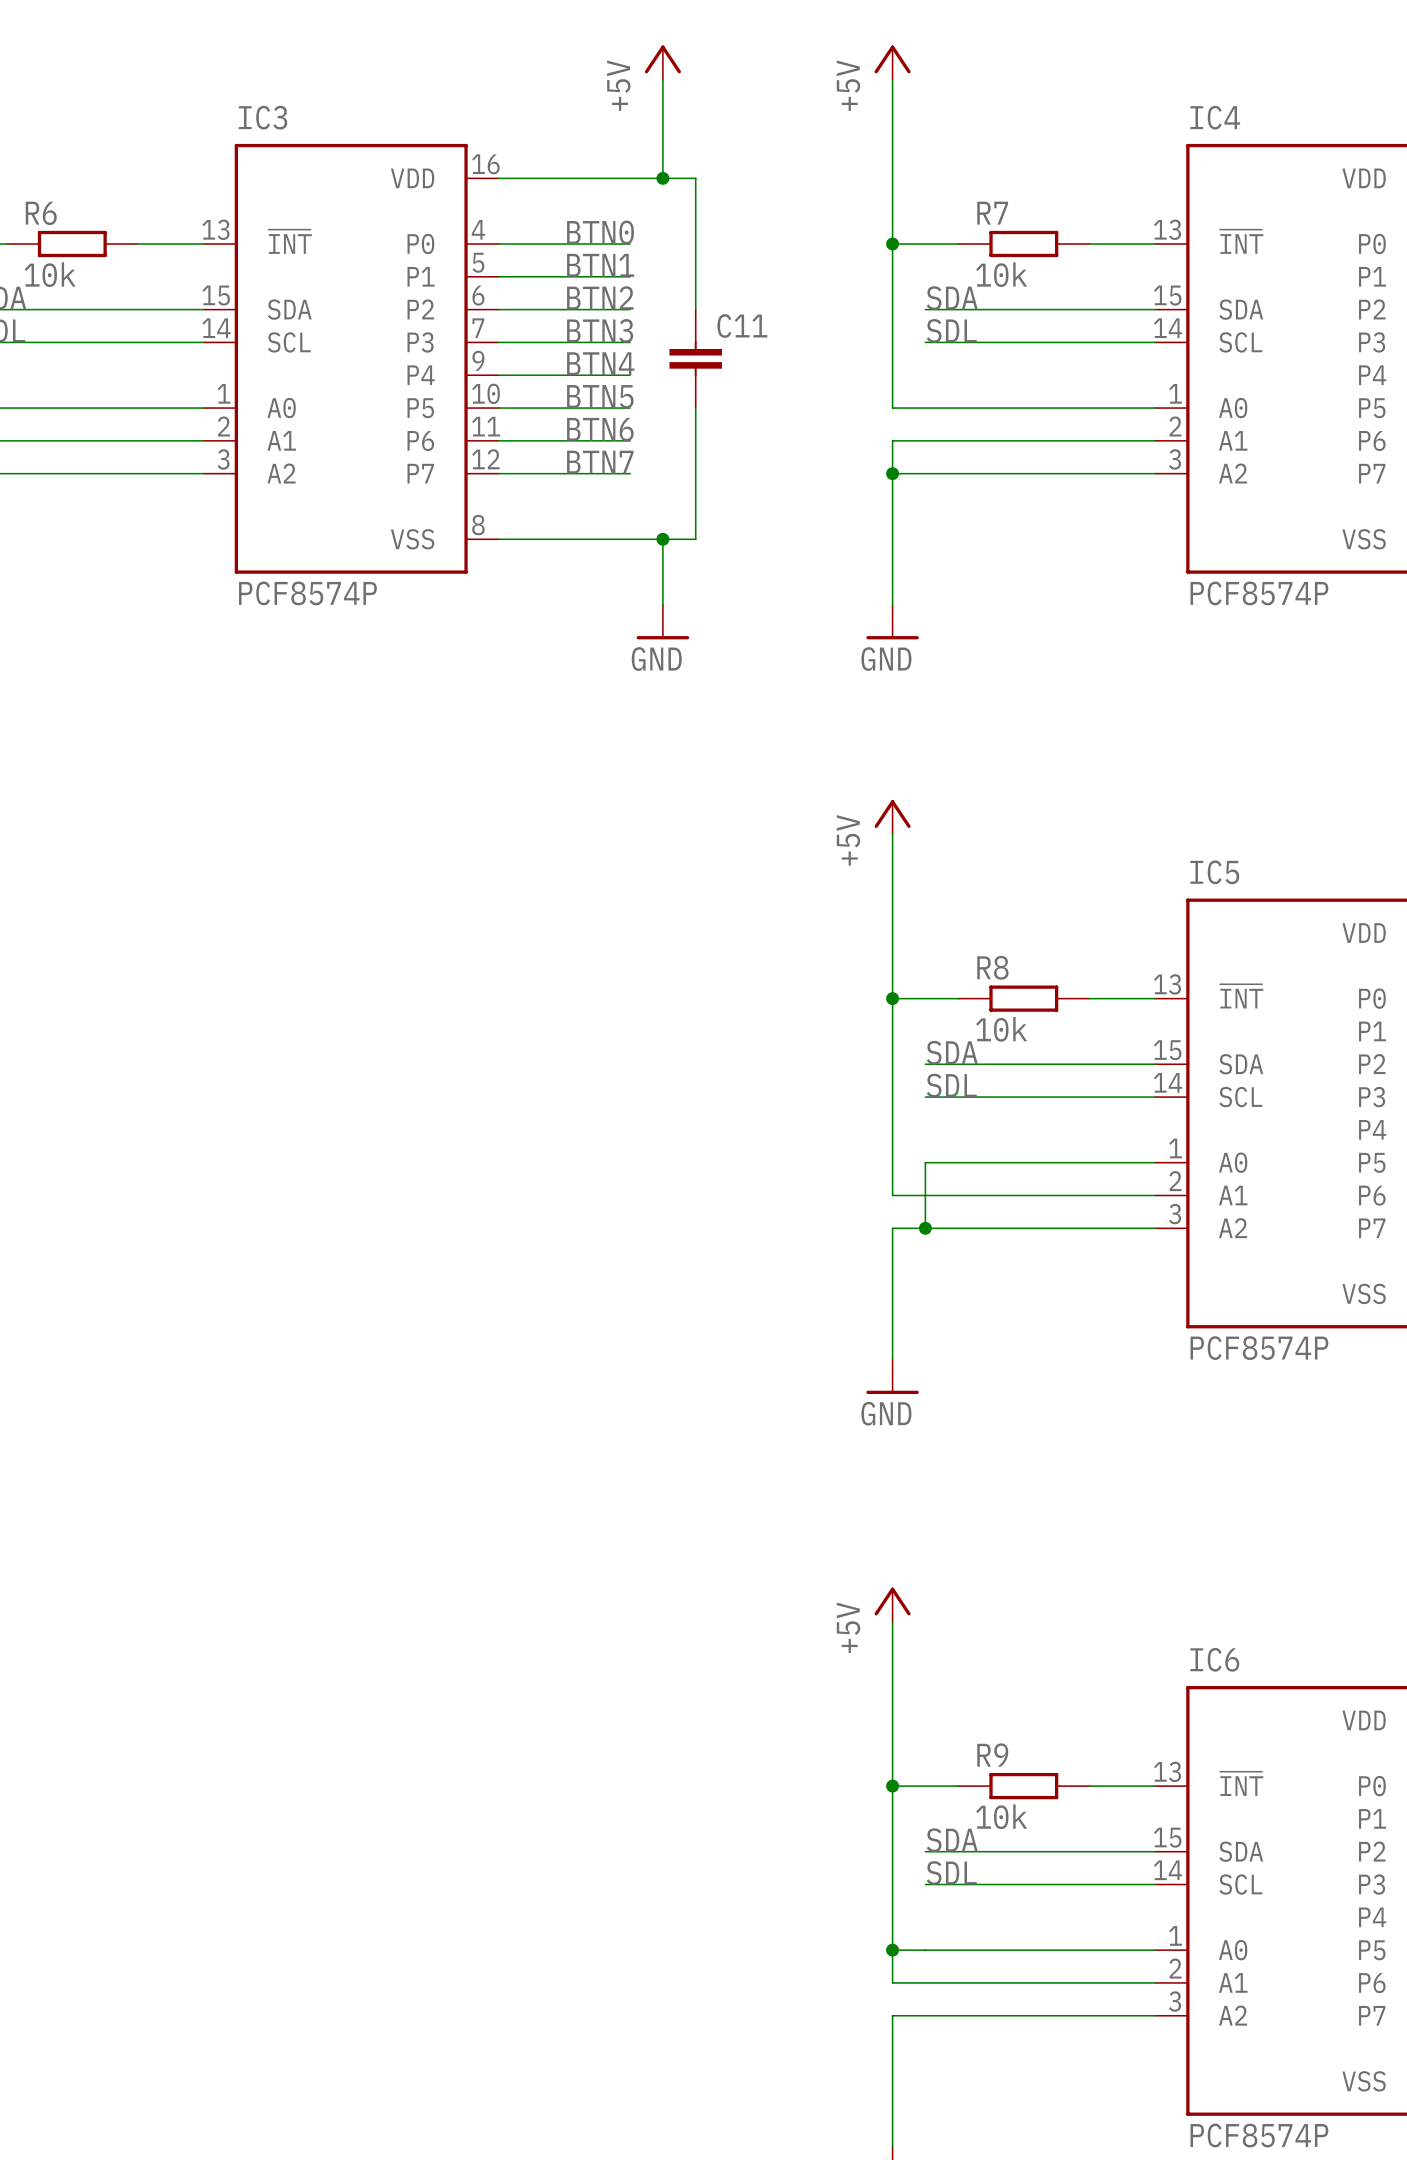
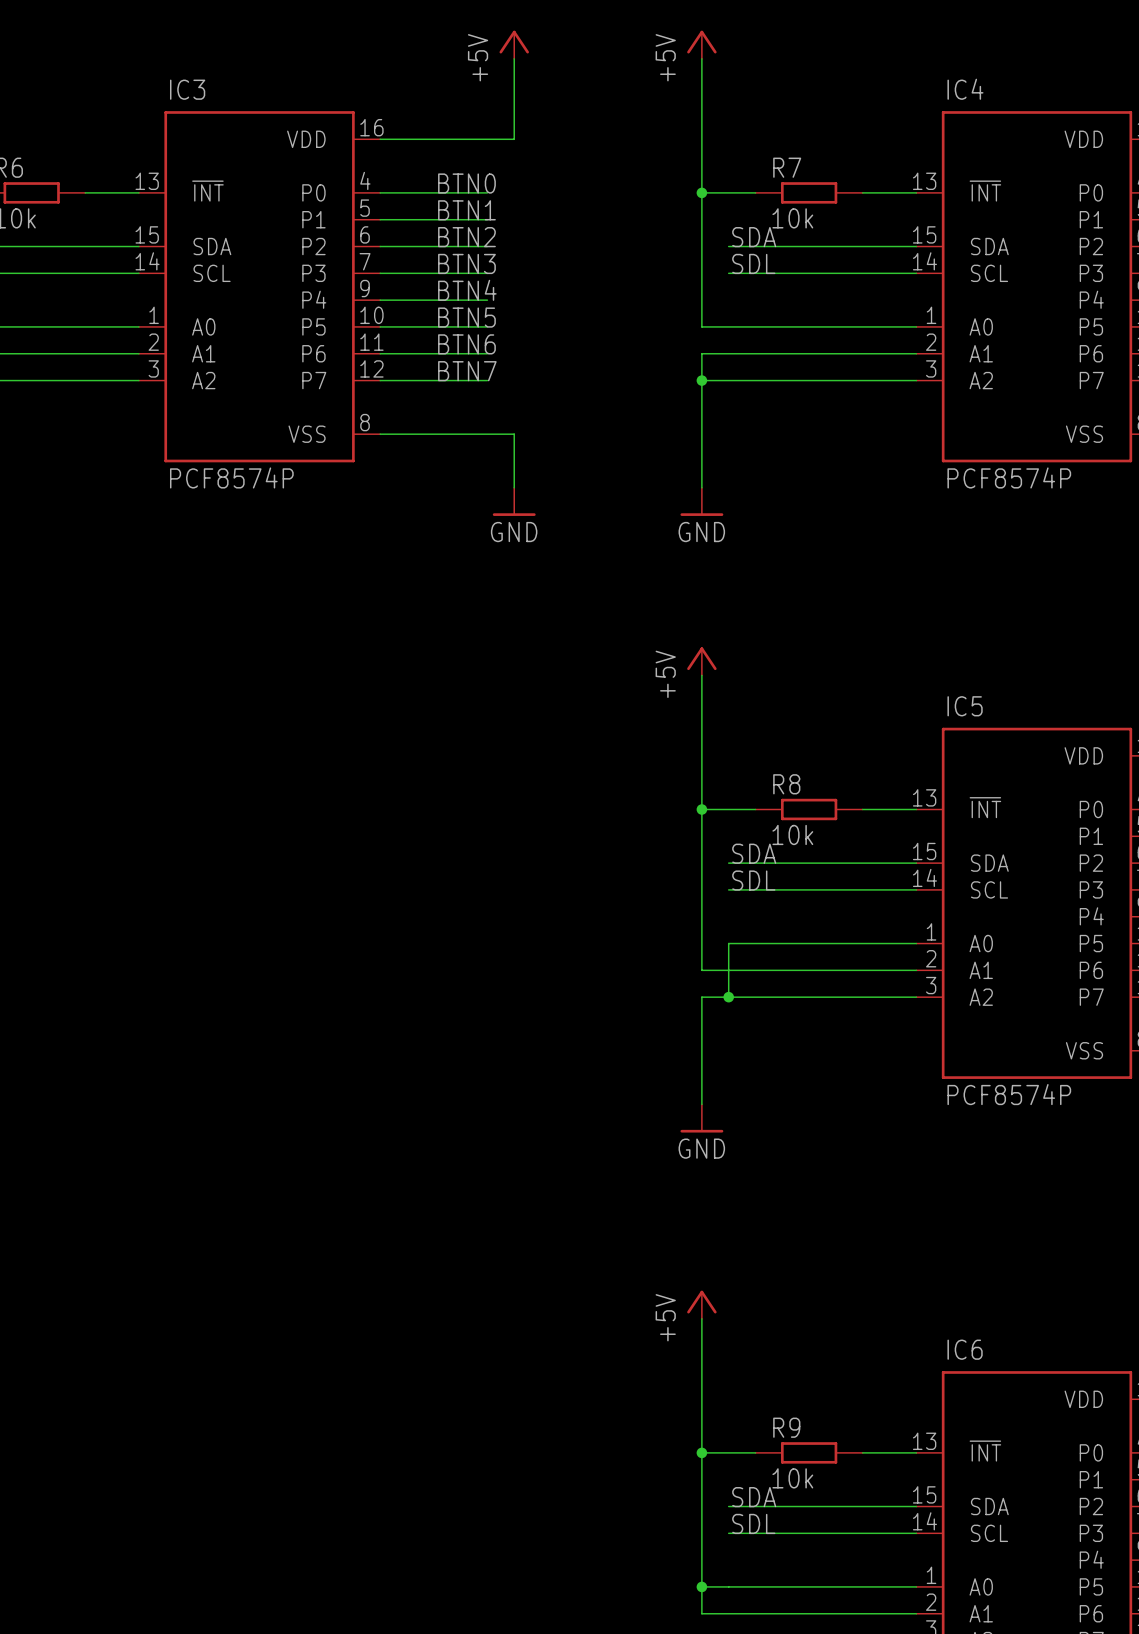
wire: (662, 178) (695, 178) (695, 309) -> none
junction: (662, 178) -> none
C11: (695, 358) -> none
wire: (695, 408) (695, 539) (662, 539) -> none
junction: (662, 539) -> none

